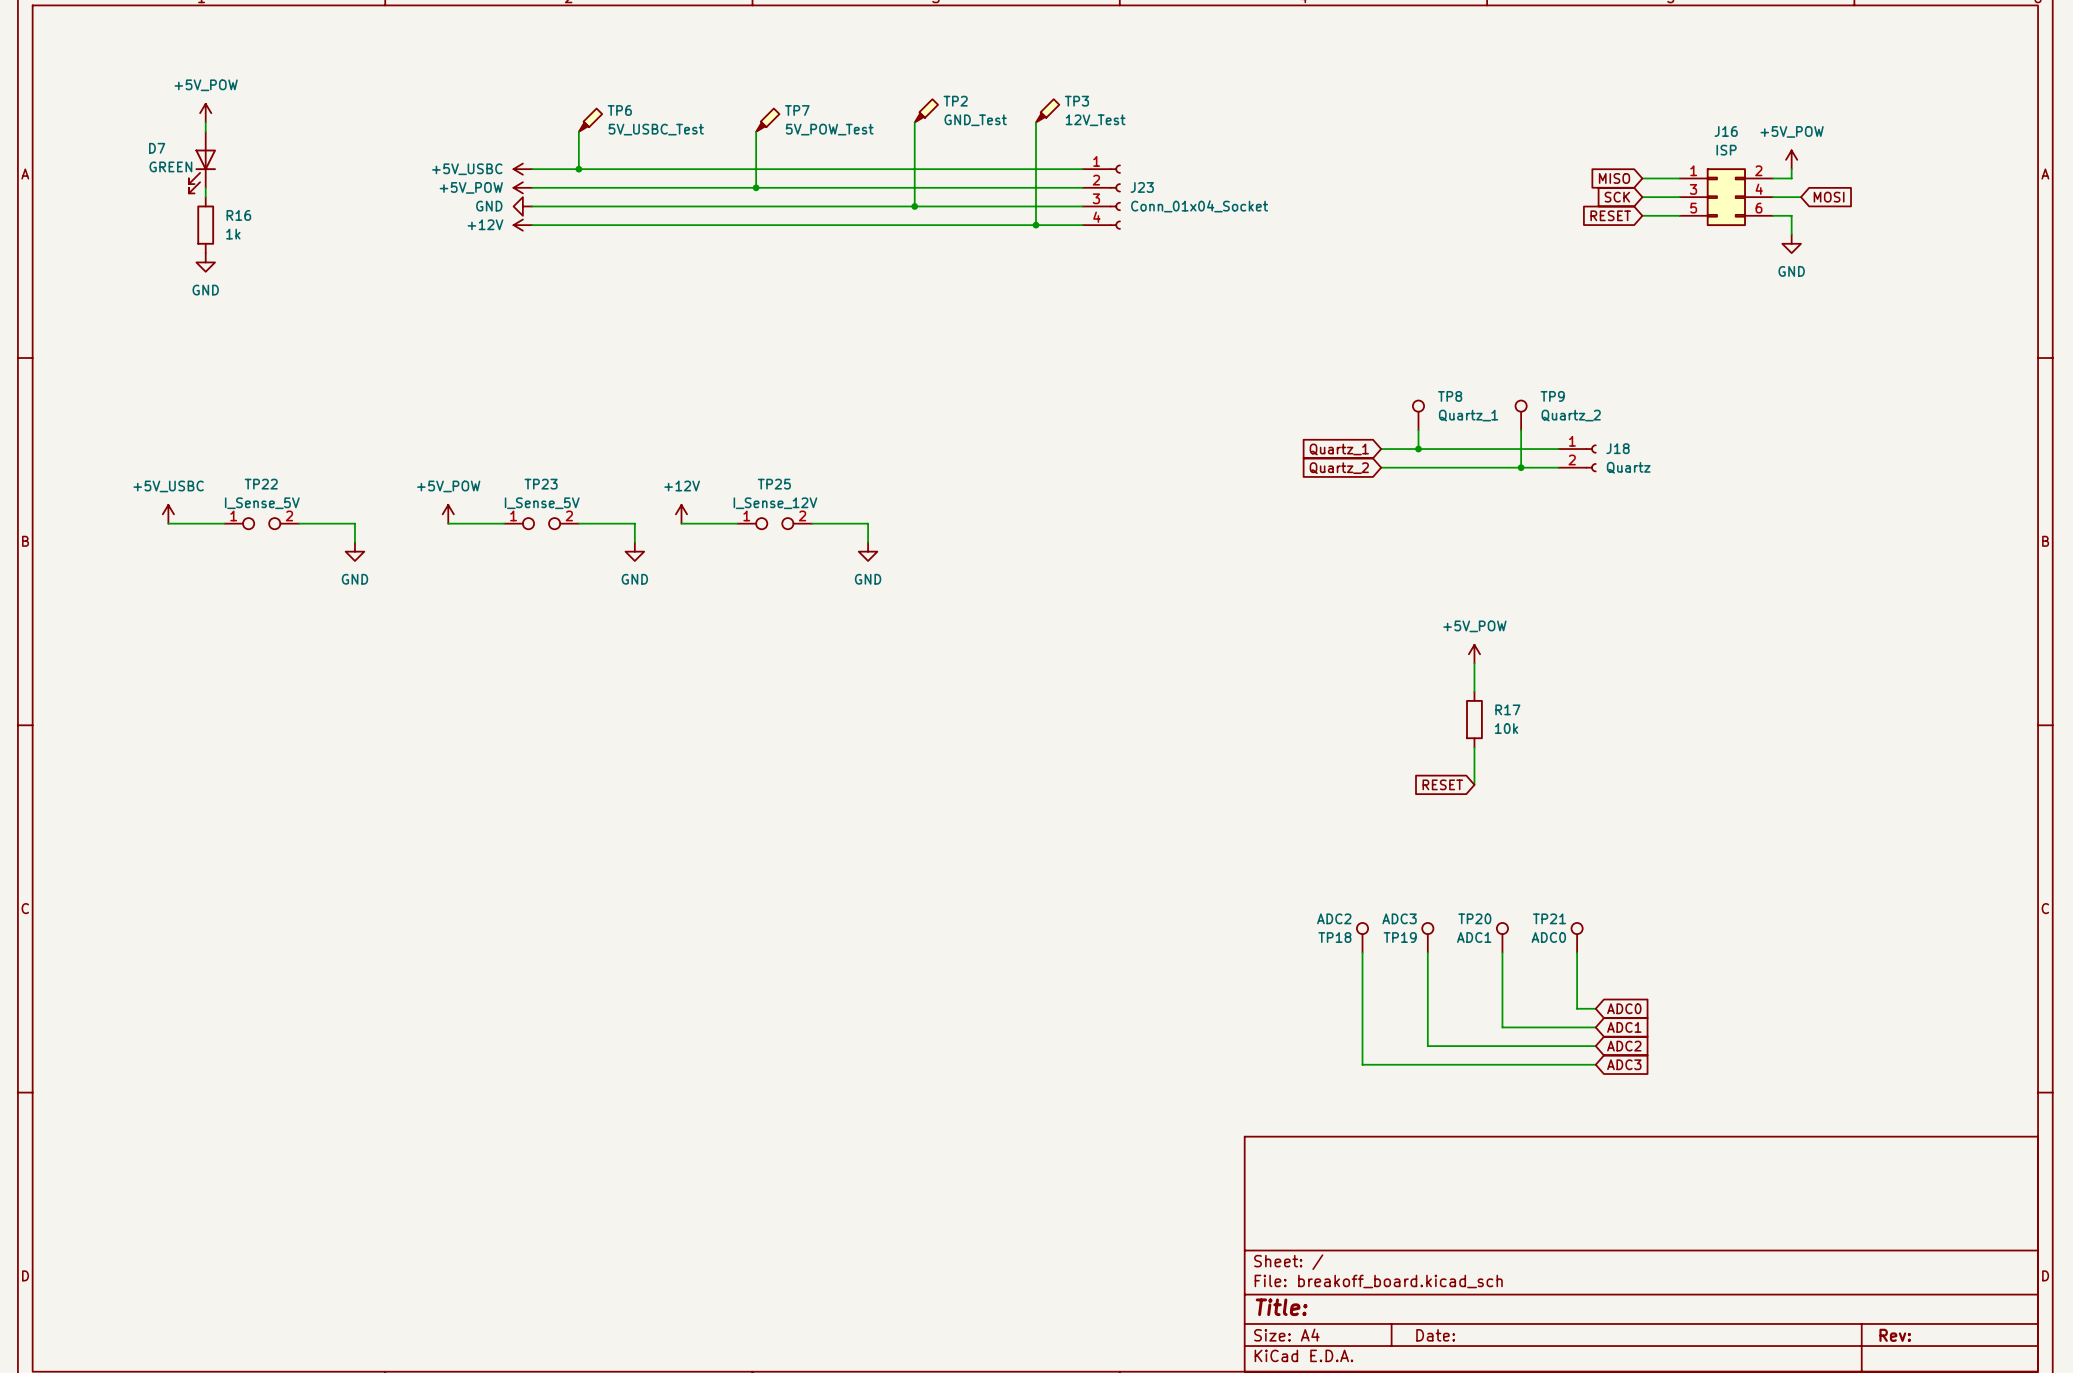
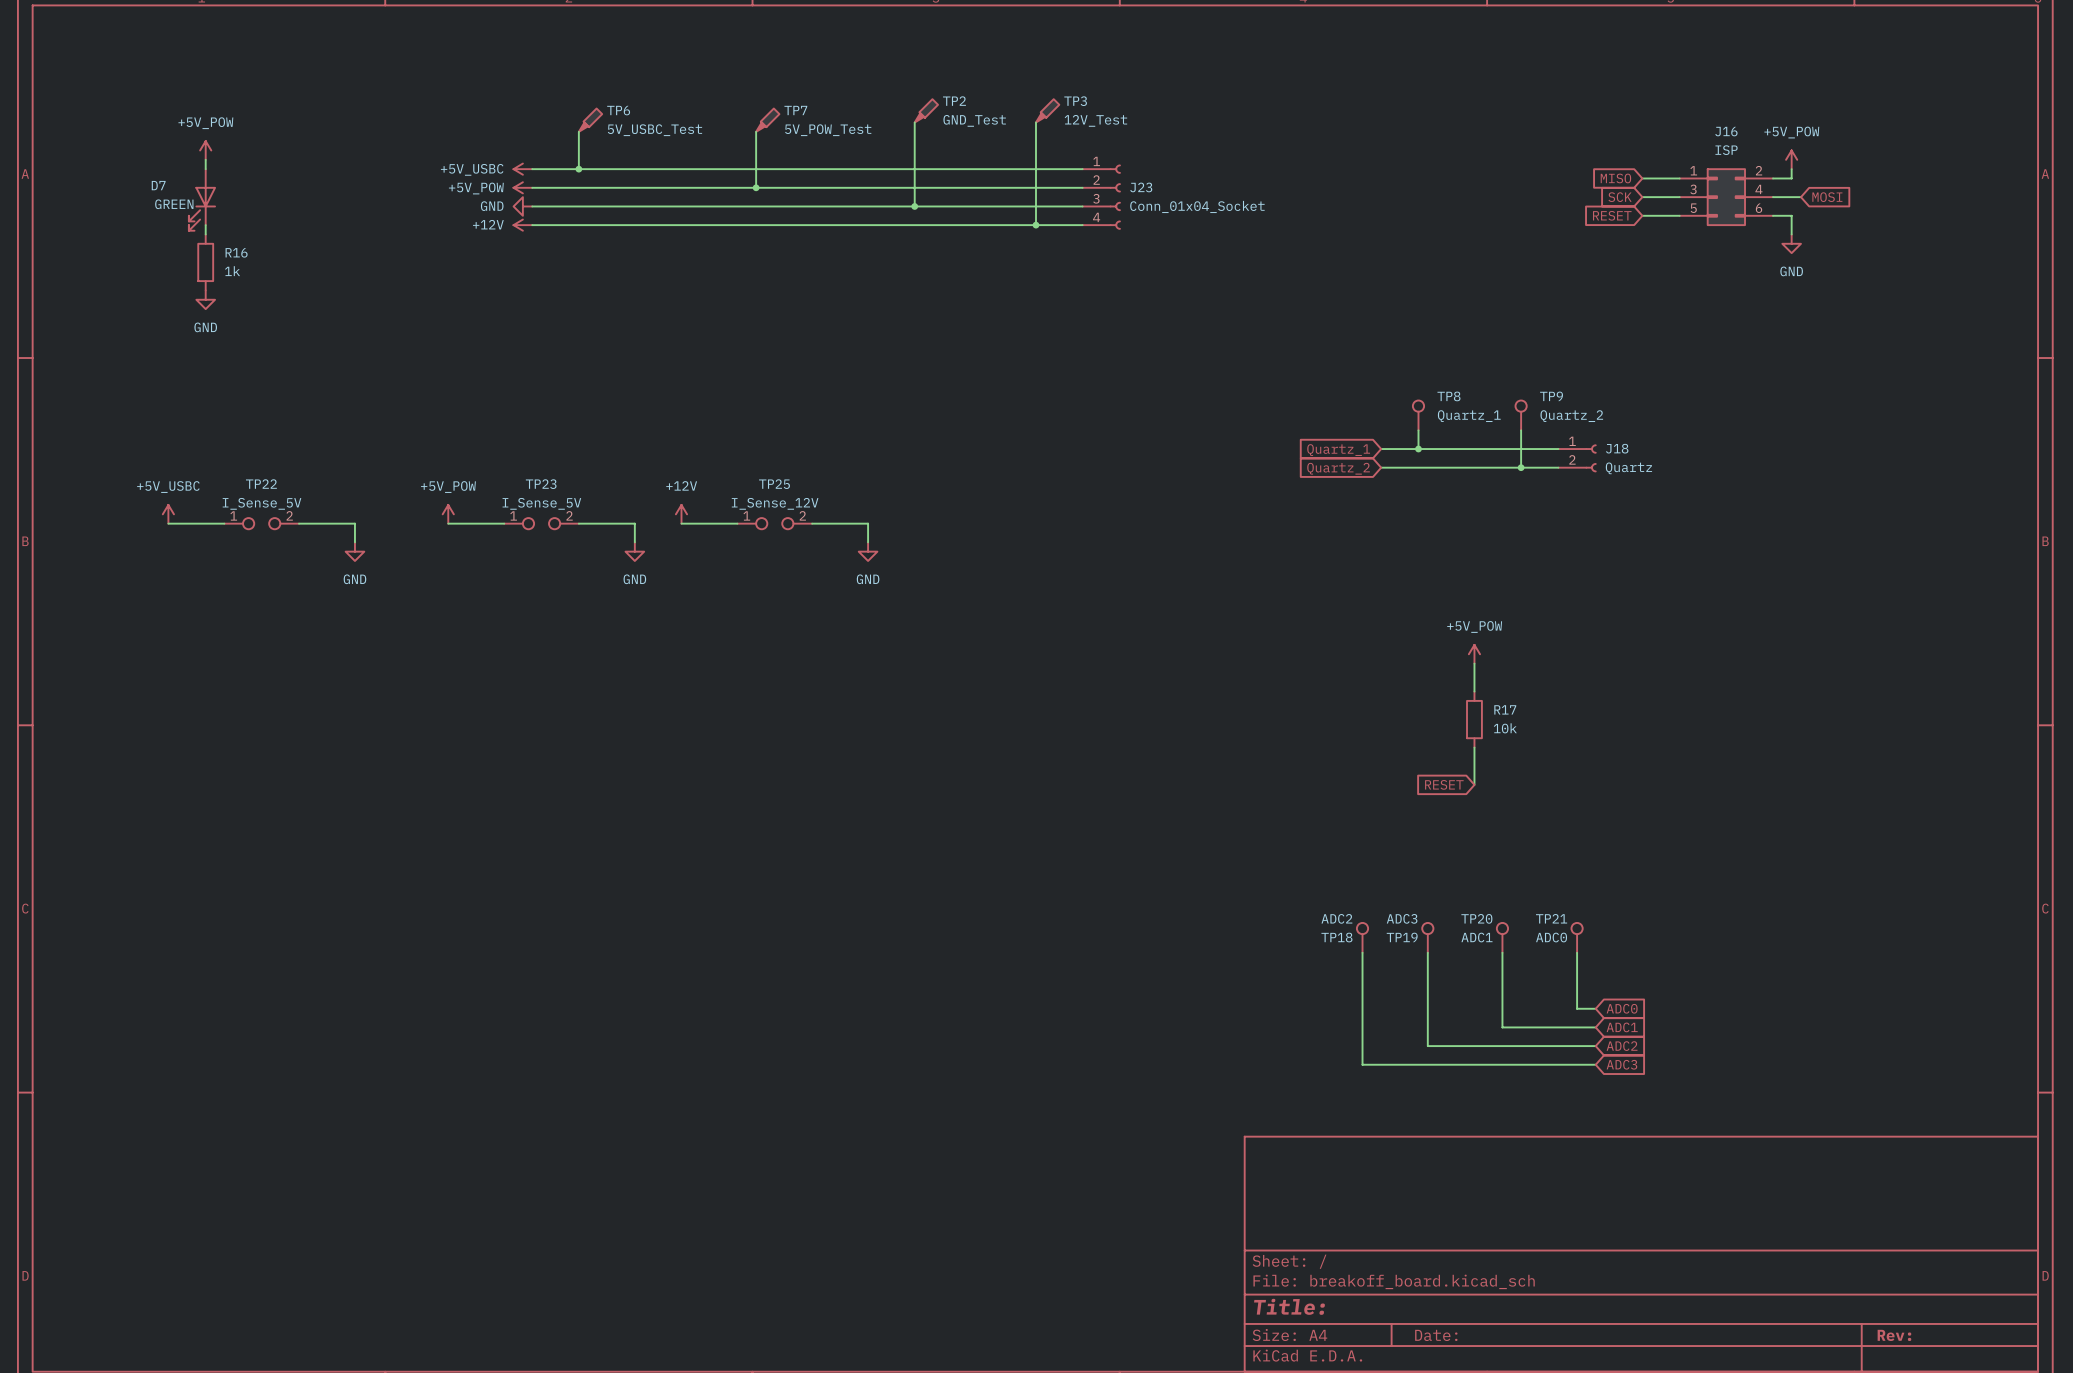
power symbol position: +5V_POW (205, 113) -> +5V_POW (205, 150)
wire: (205, 122) (205, 131) -> (205, 225) (205, 234)
D7 position: (202, 162) -> (202, 199)
R16 position: (205, 225) -> (205, 262)
power symbol position: GND (205, 262) -> GND (205, 299)

